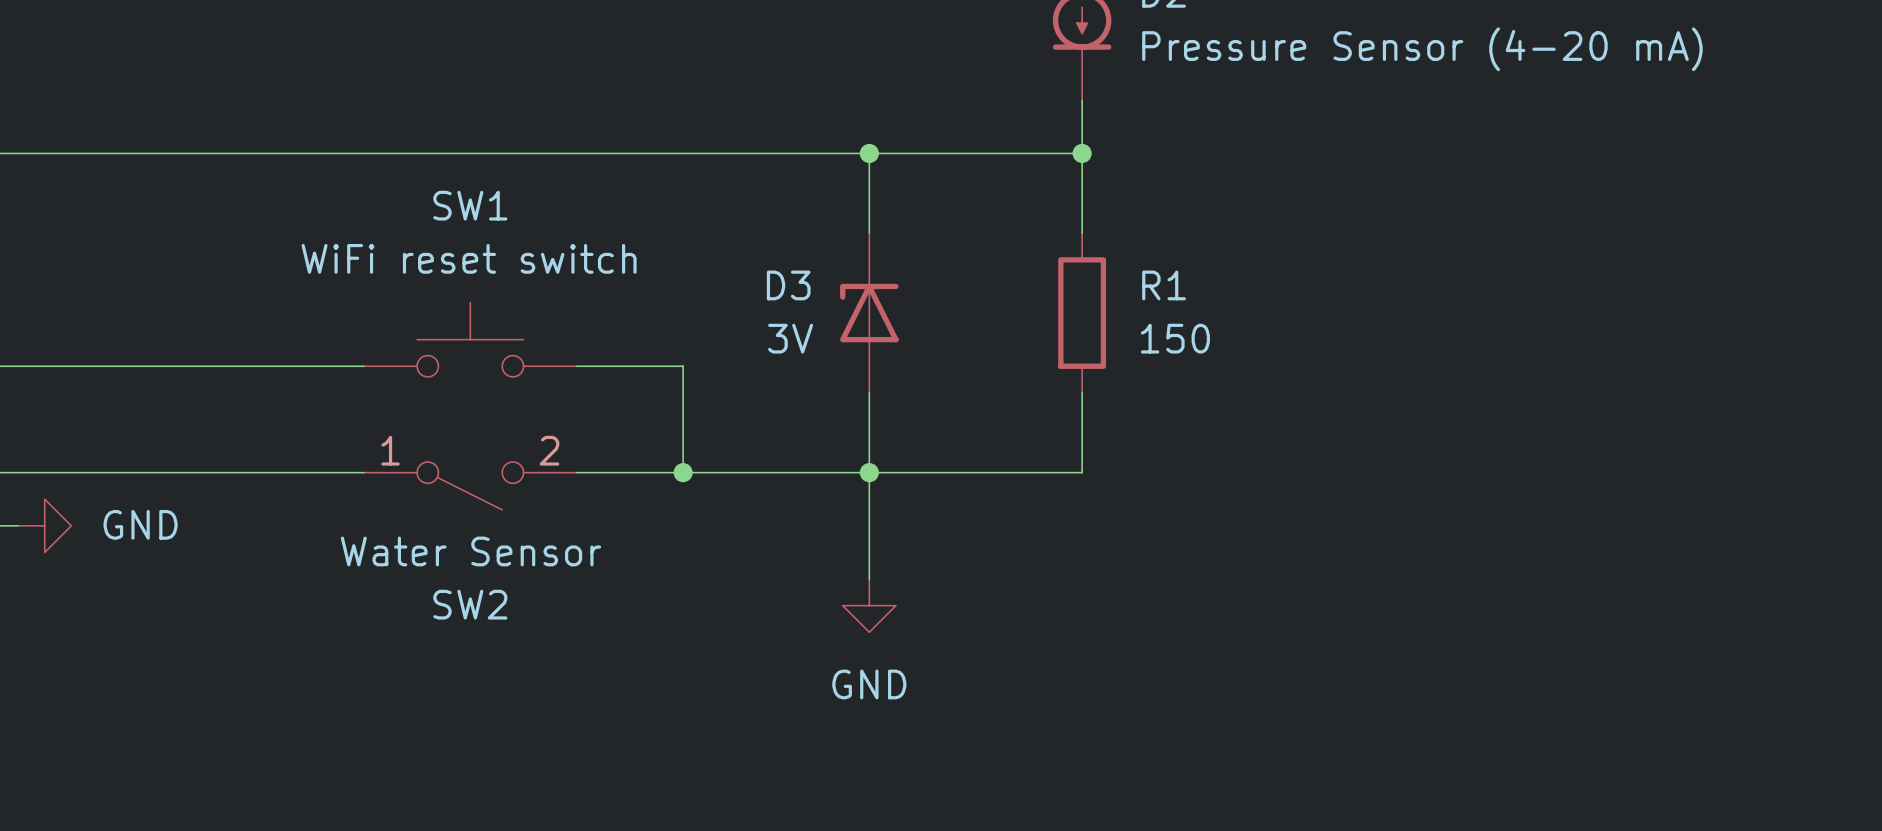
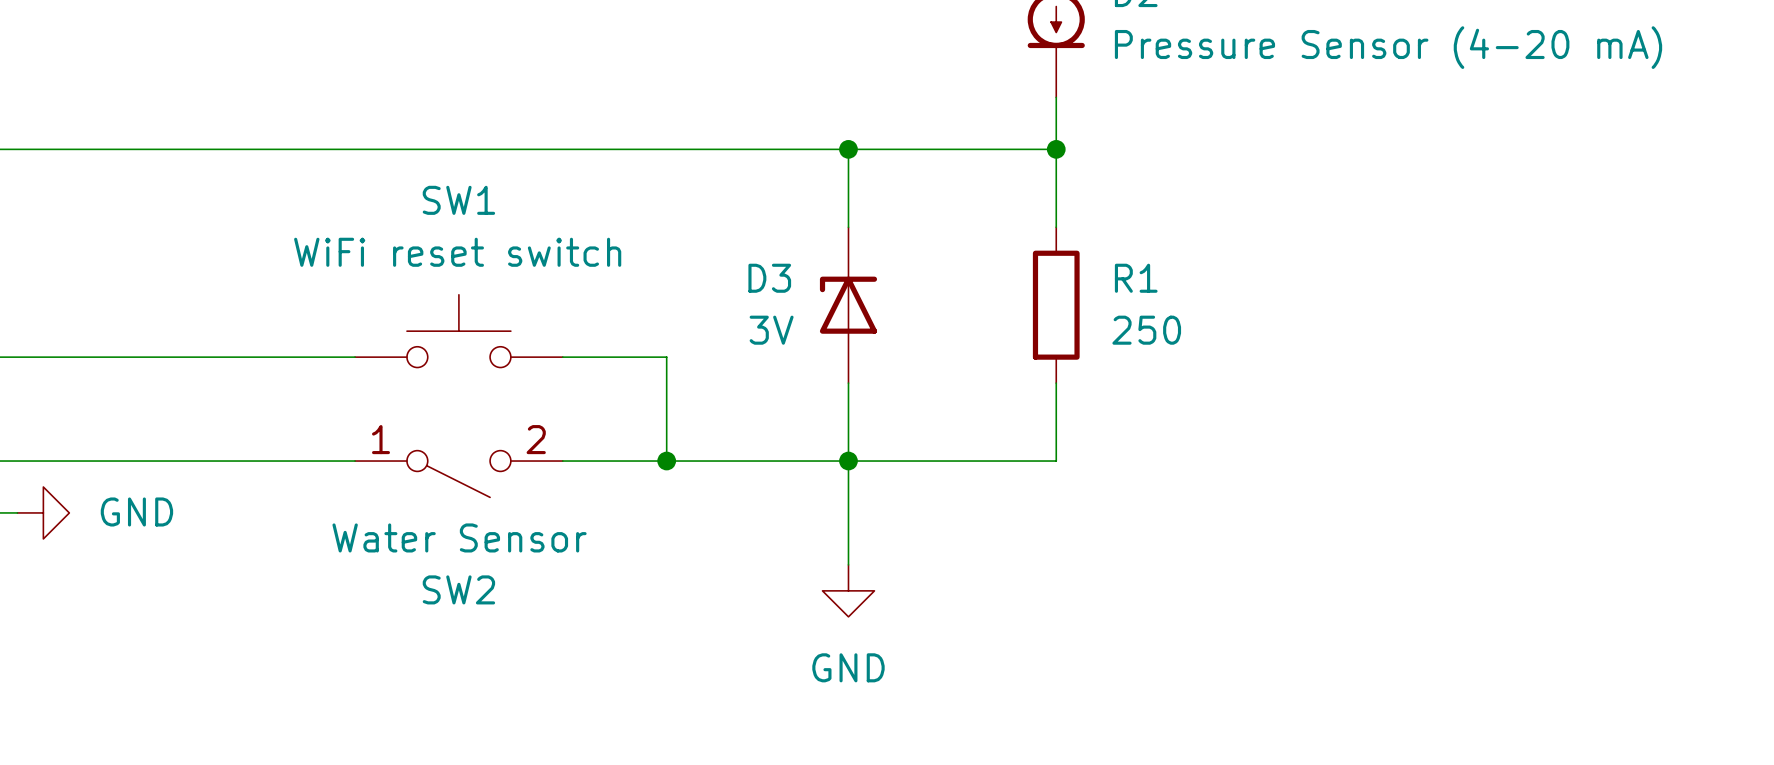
R1 value: 150 (1175, 338) -> 250 (1146, 330)

